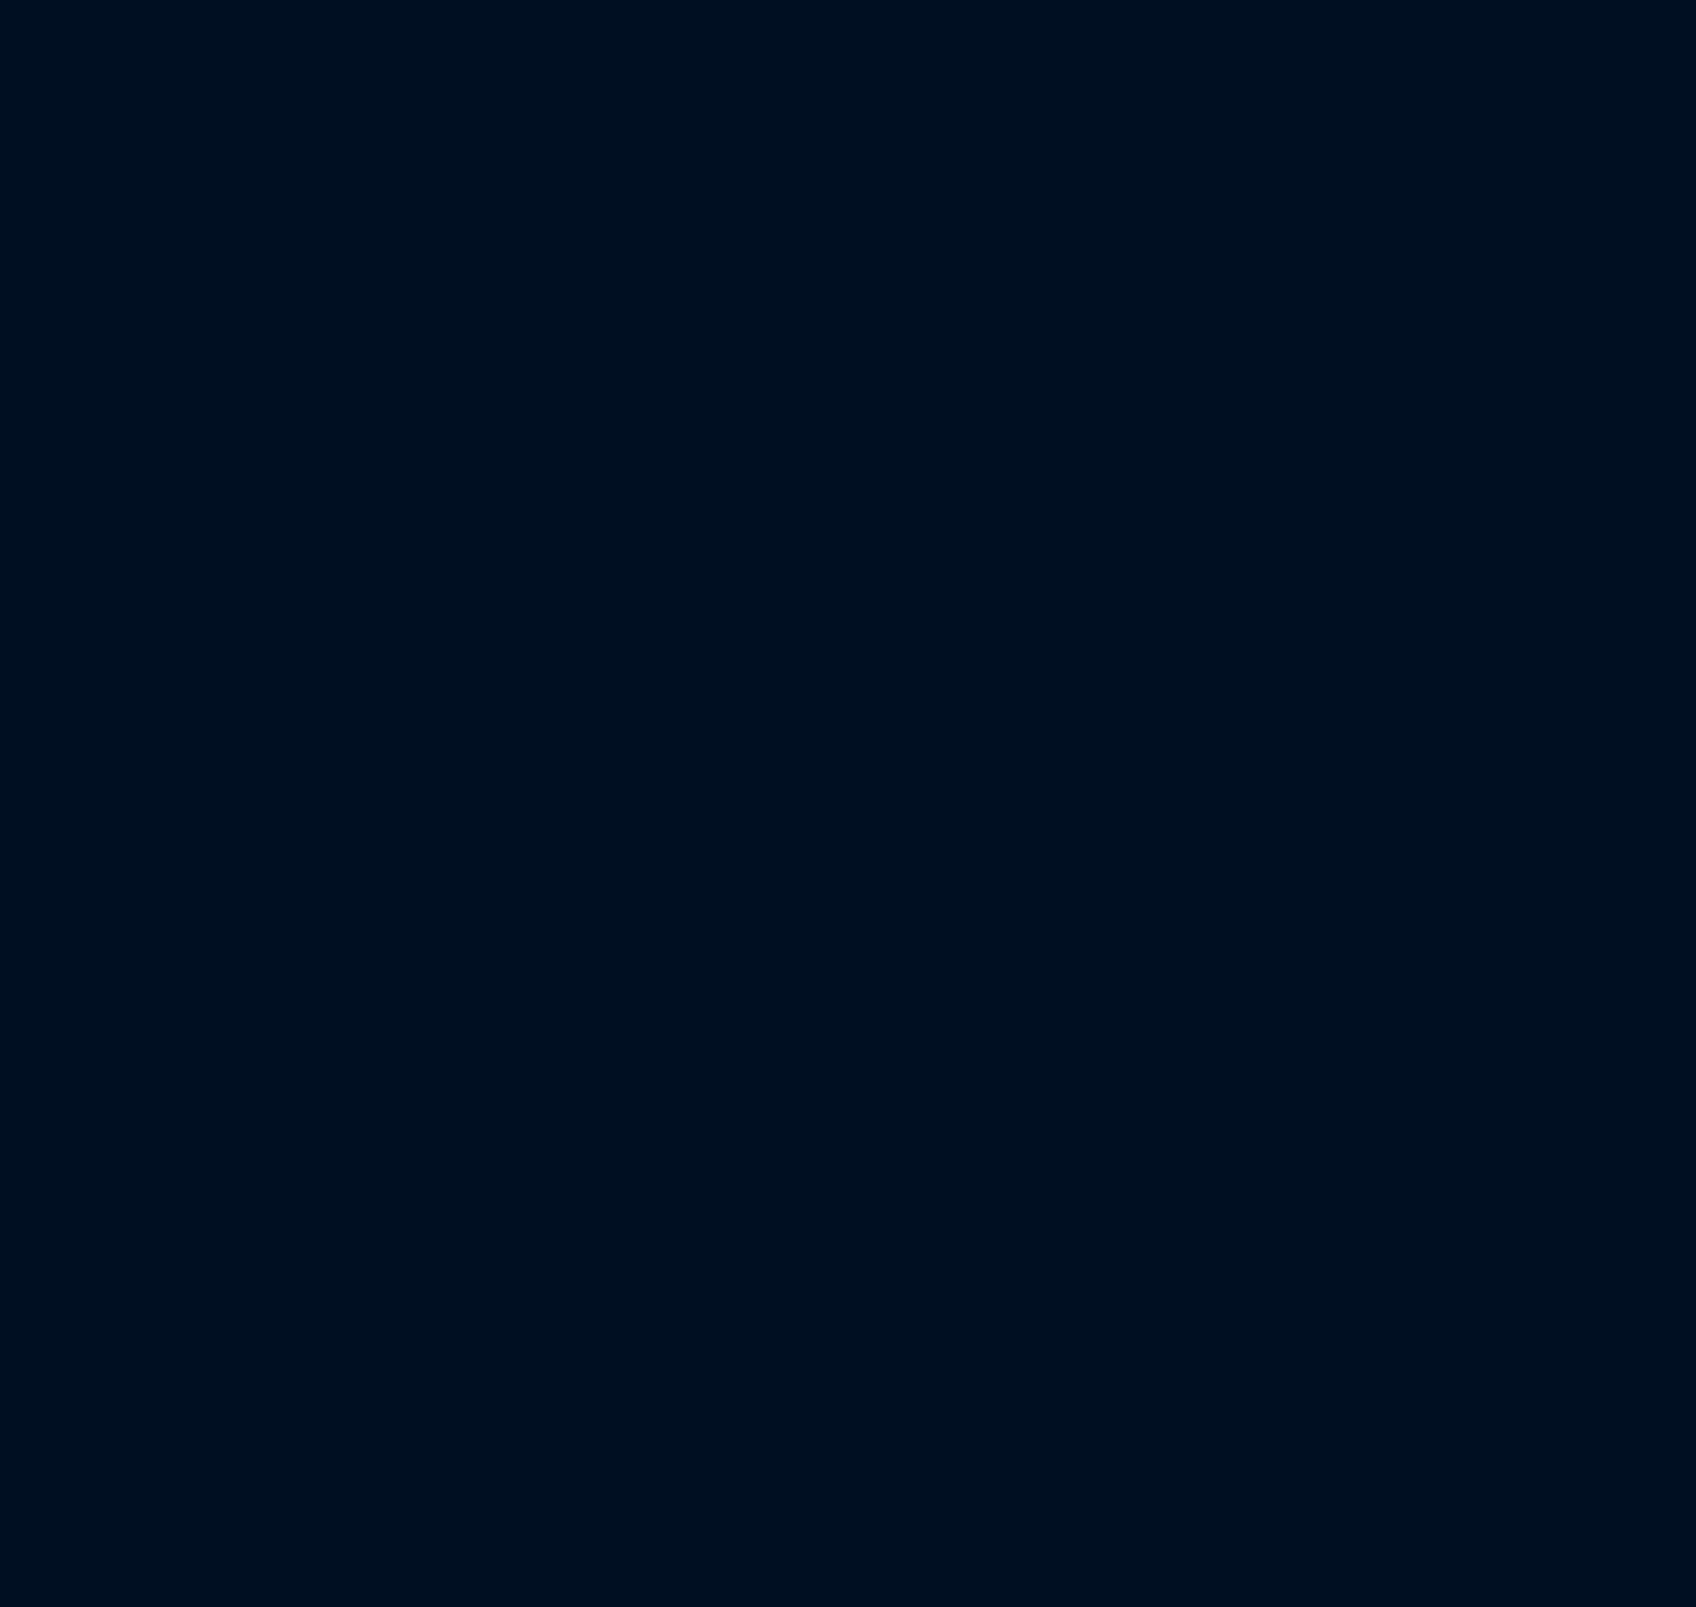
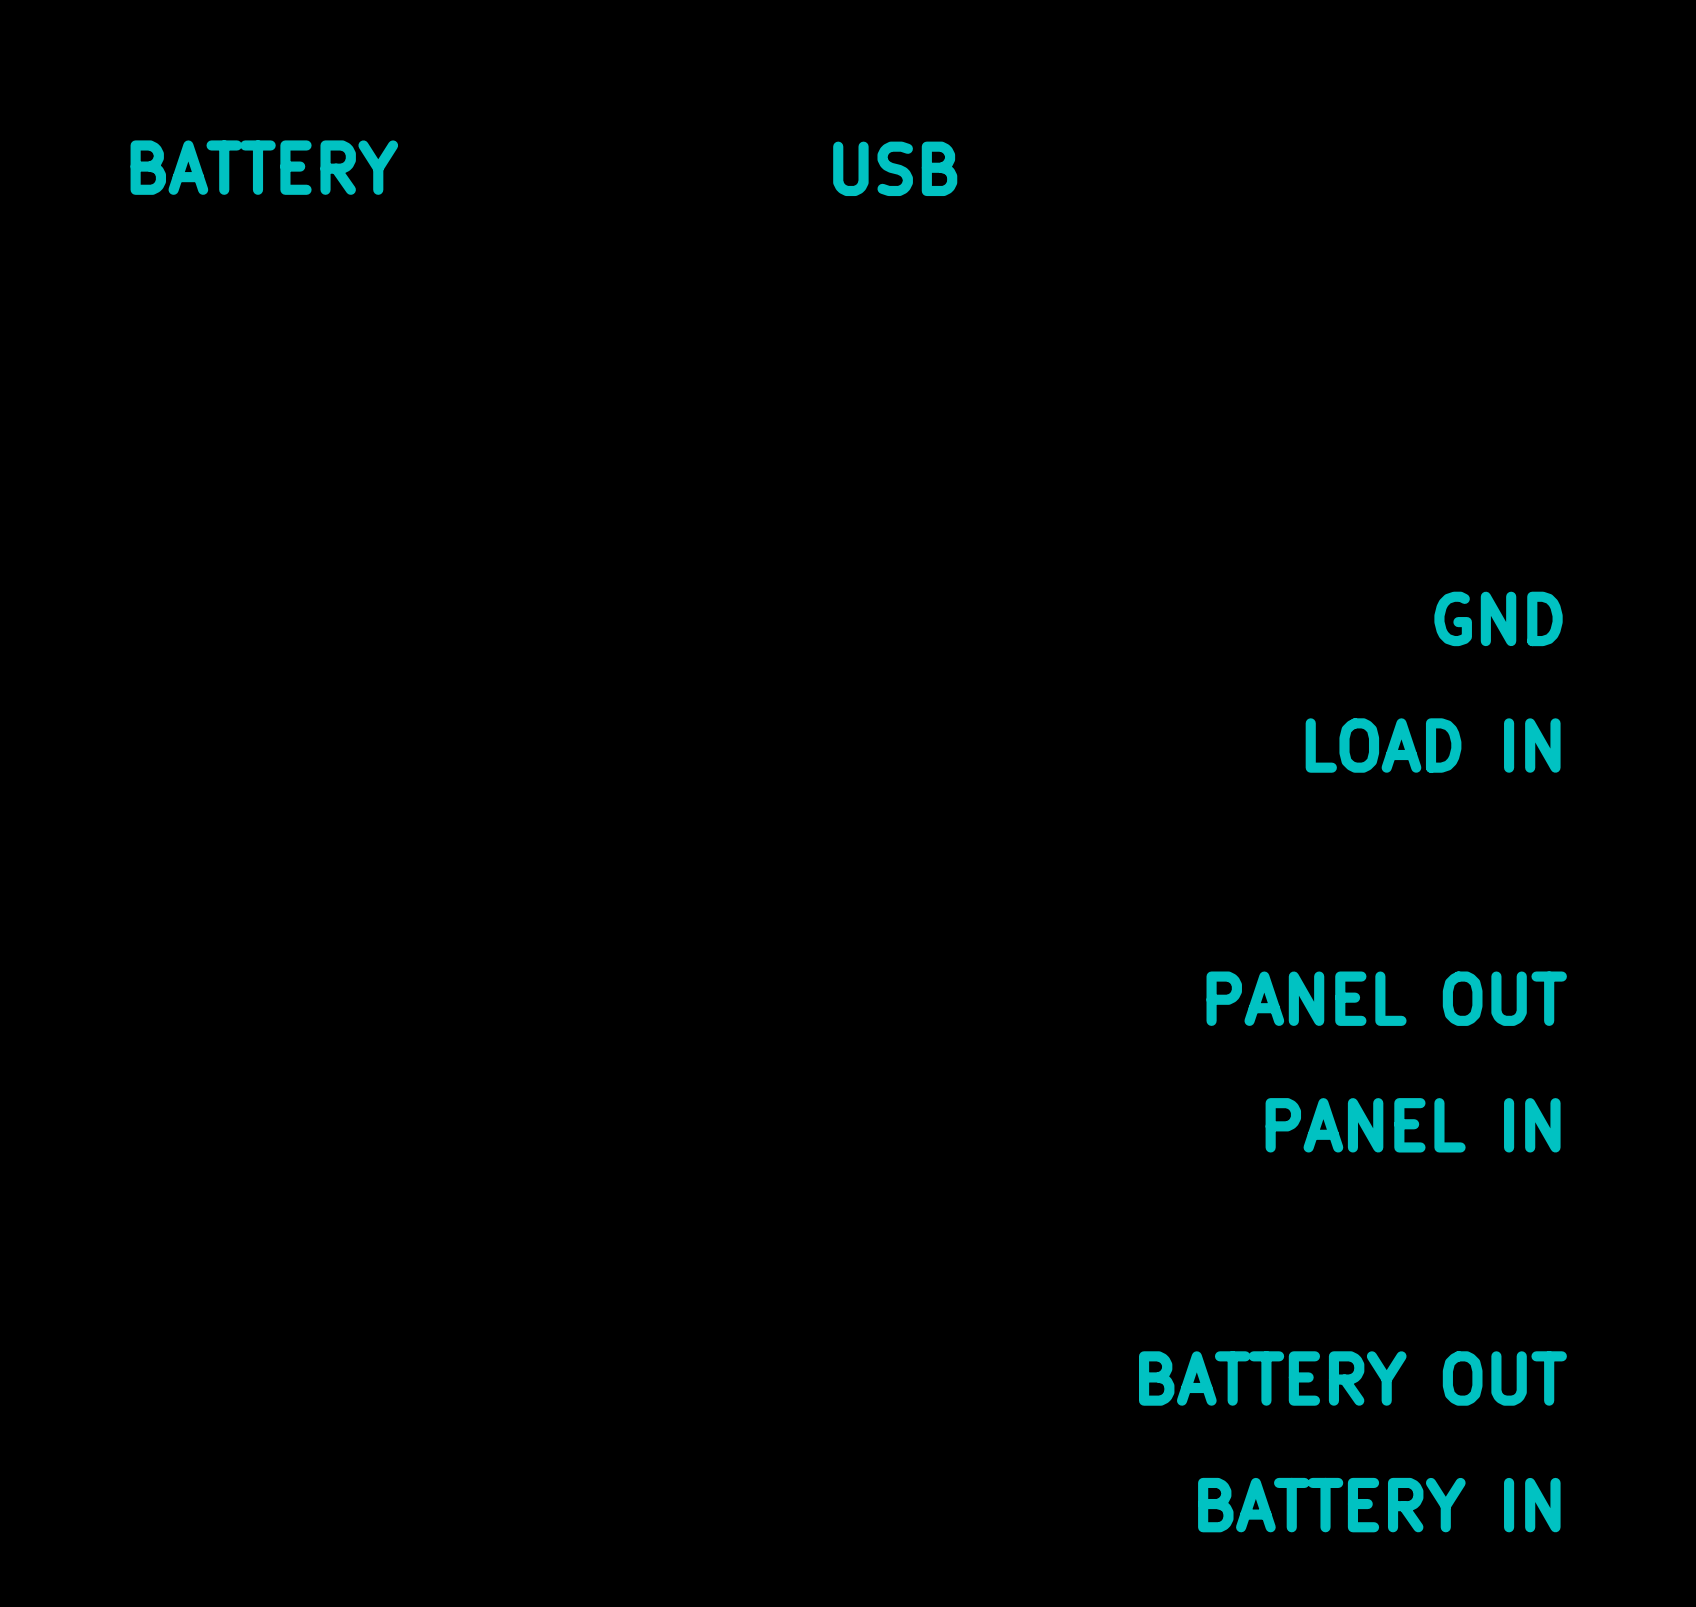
text: none -> BATTERY (264, 167)
text: none -> USB (895, 168)
text: none -> GND (1498, 618)
text: none -> LOAD IN (1433, 745)
text: none -> PANEL OUT (1386, 998)
text: none -> PANEL IN (1413, 1125)
text: none -> BATTERY OUT (1352, 1378)
text: none -> BATTERY IN (1379, 1505)

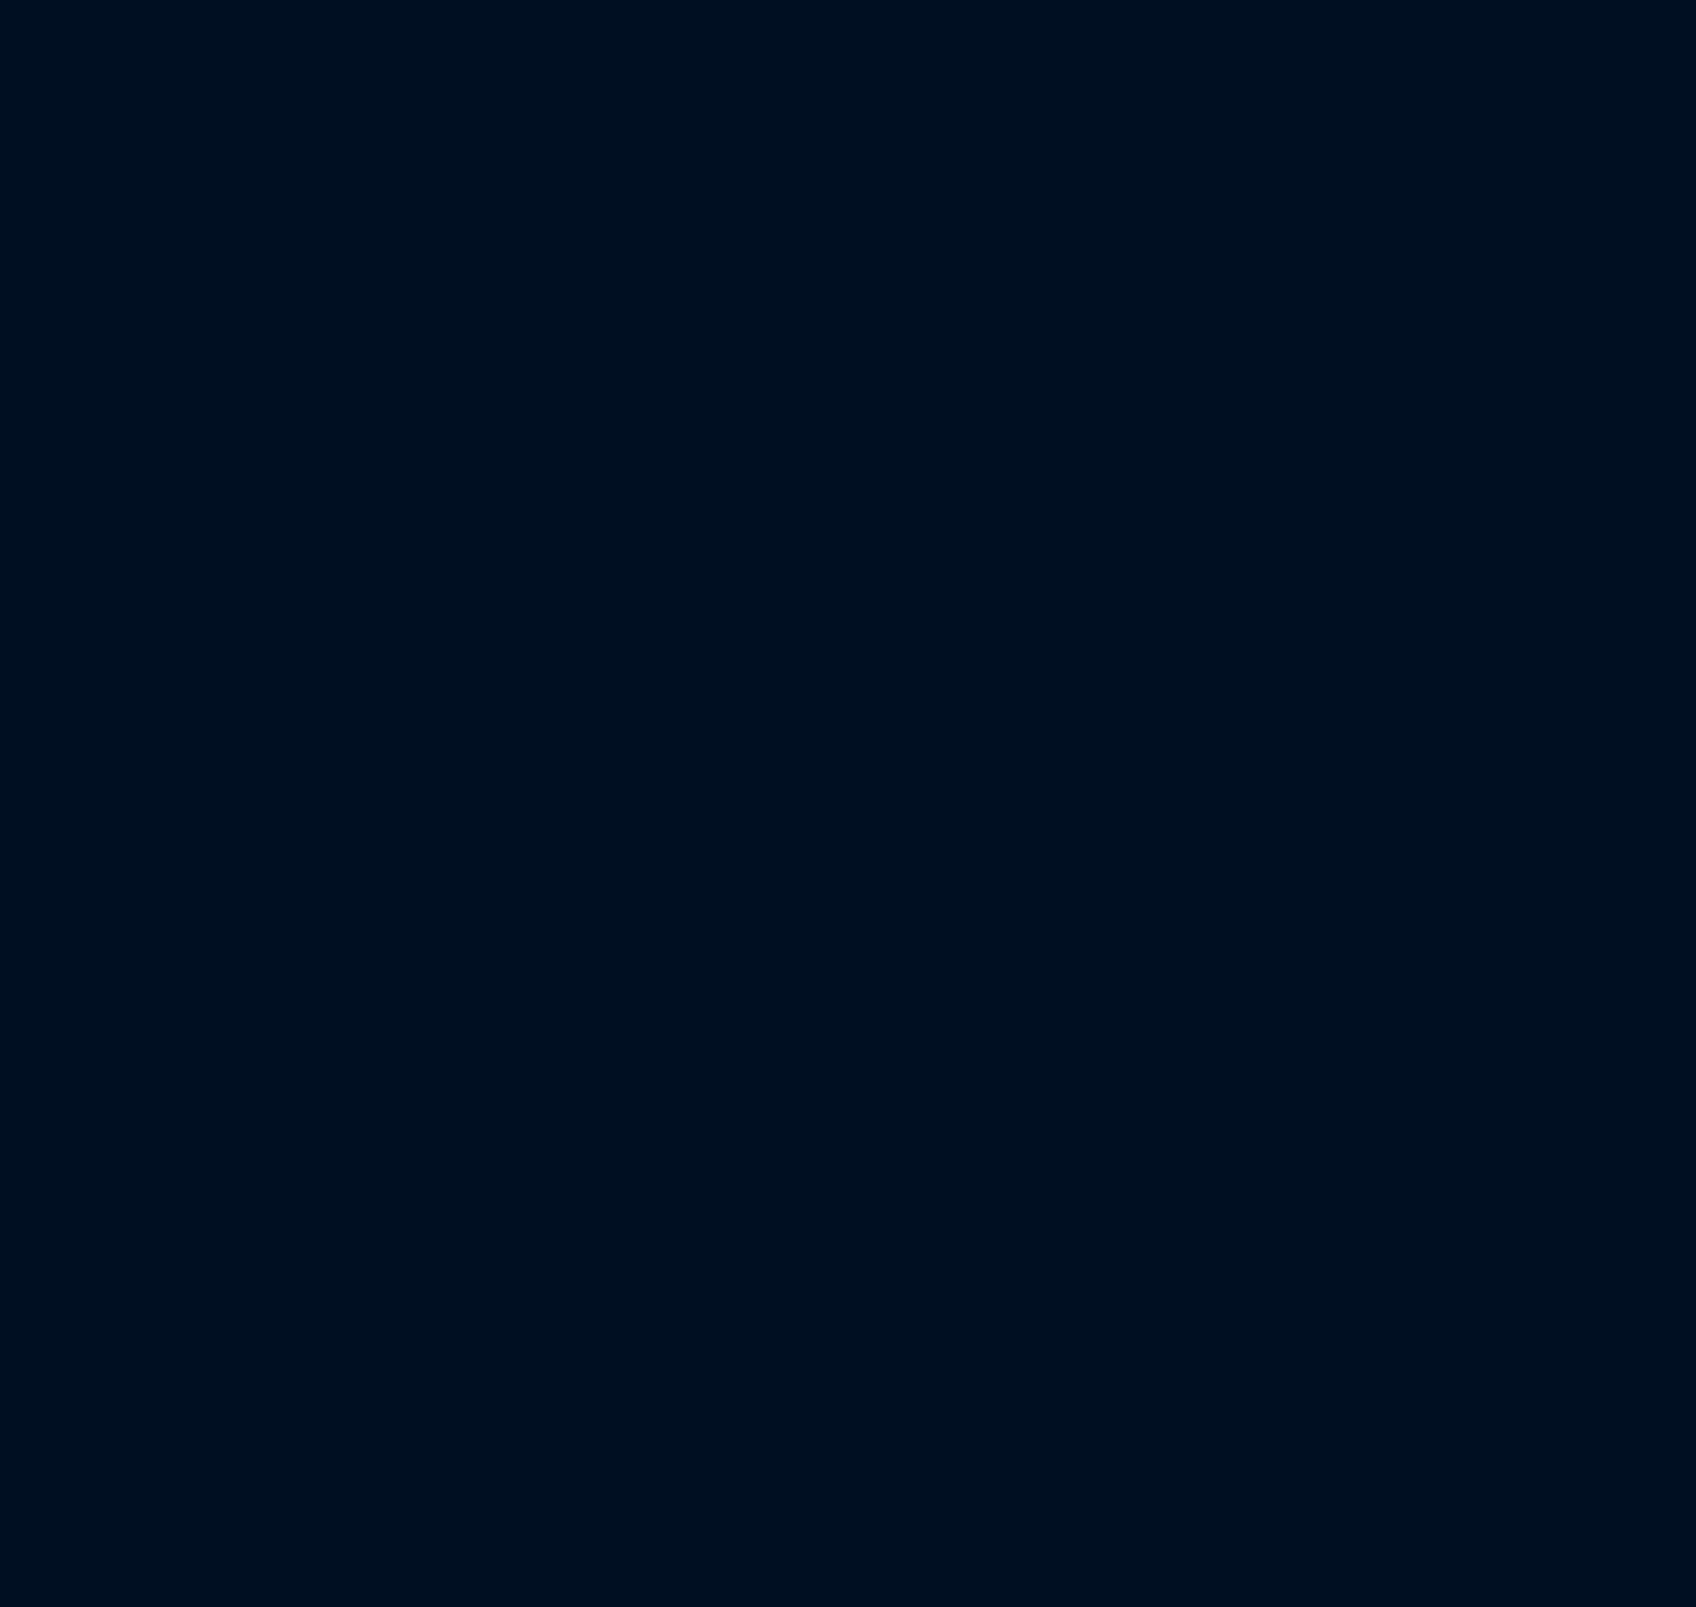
text: BATTERY (264, 167) -> none
text: USB (895, 168) -> none
text: GND (1498, 618) -> none
text: LOAD IN (1433, 745) -> none
text: PANEL OUT (1386, 998) -> none
text: PANEL IN (1413, 1125) -> none
text: BATTERY OUT (1352, 1378) -> none
text: BATTERY IN (1379, 1505) -> none

